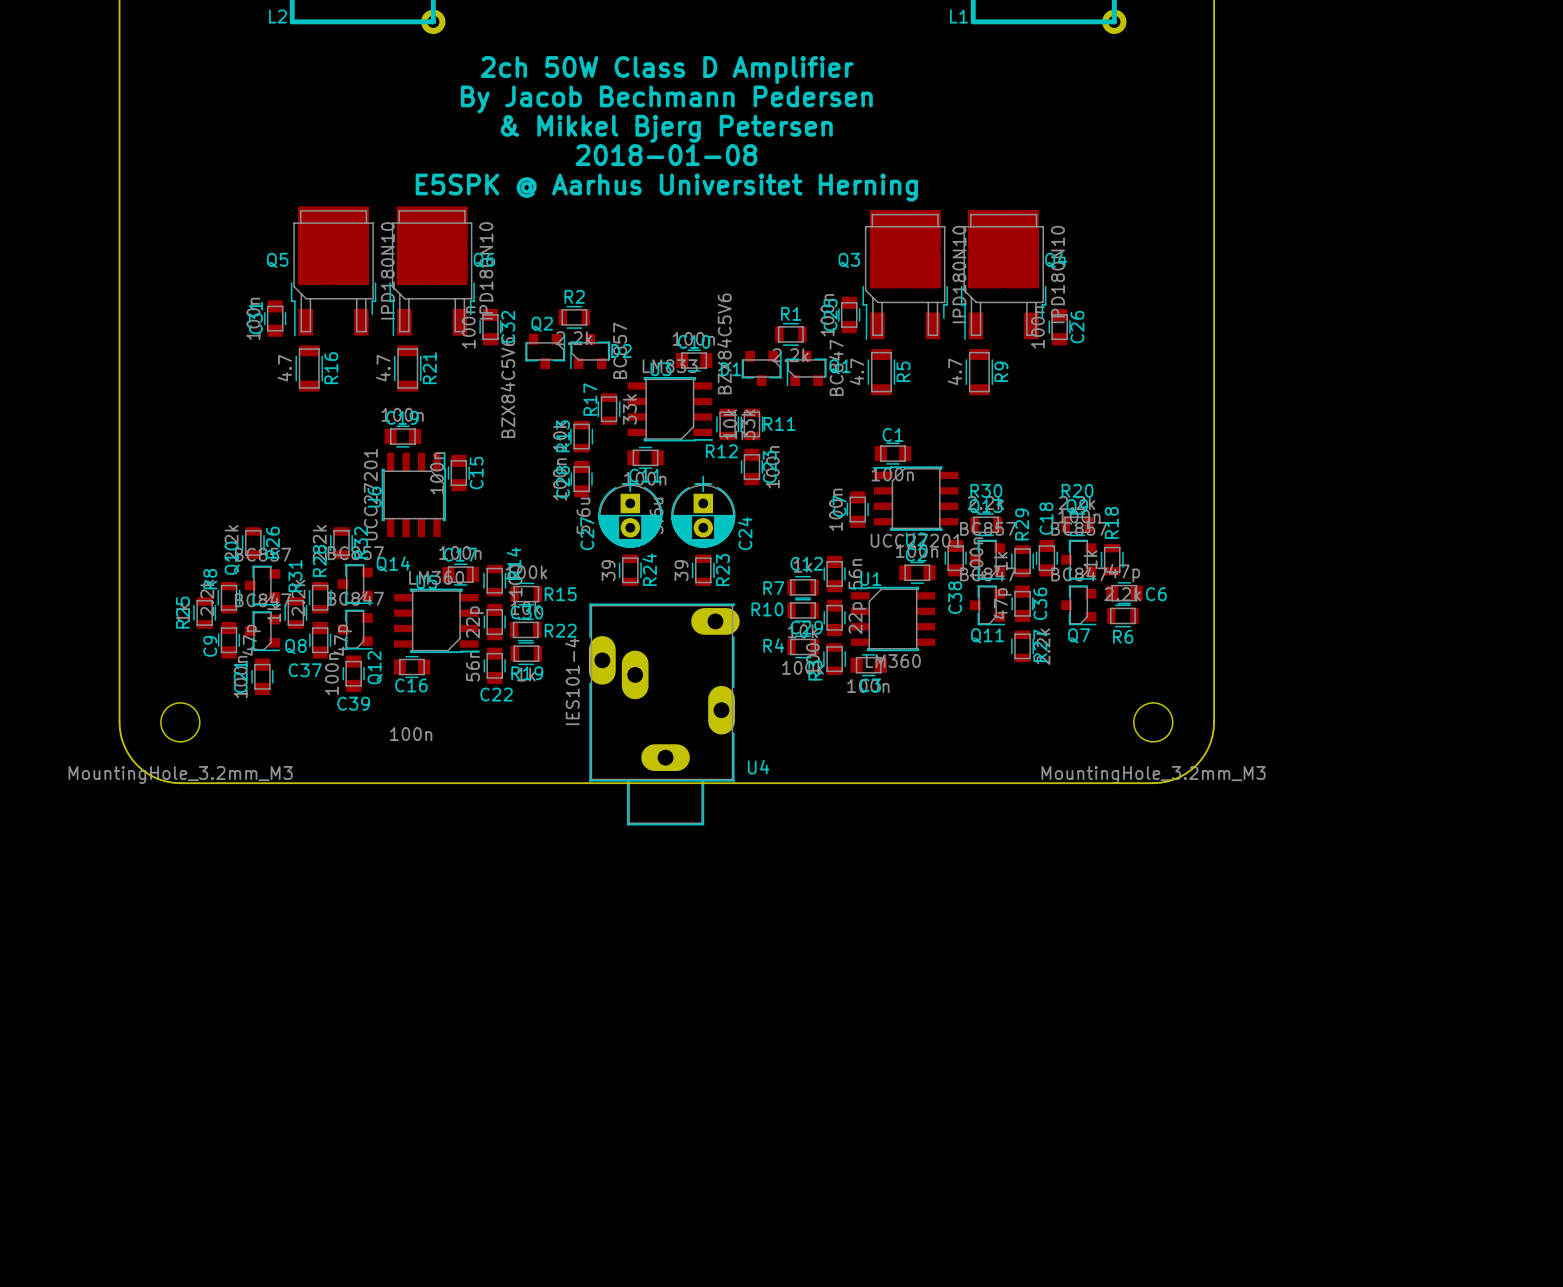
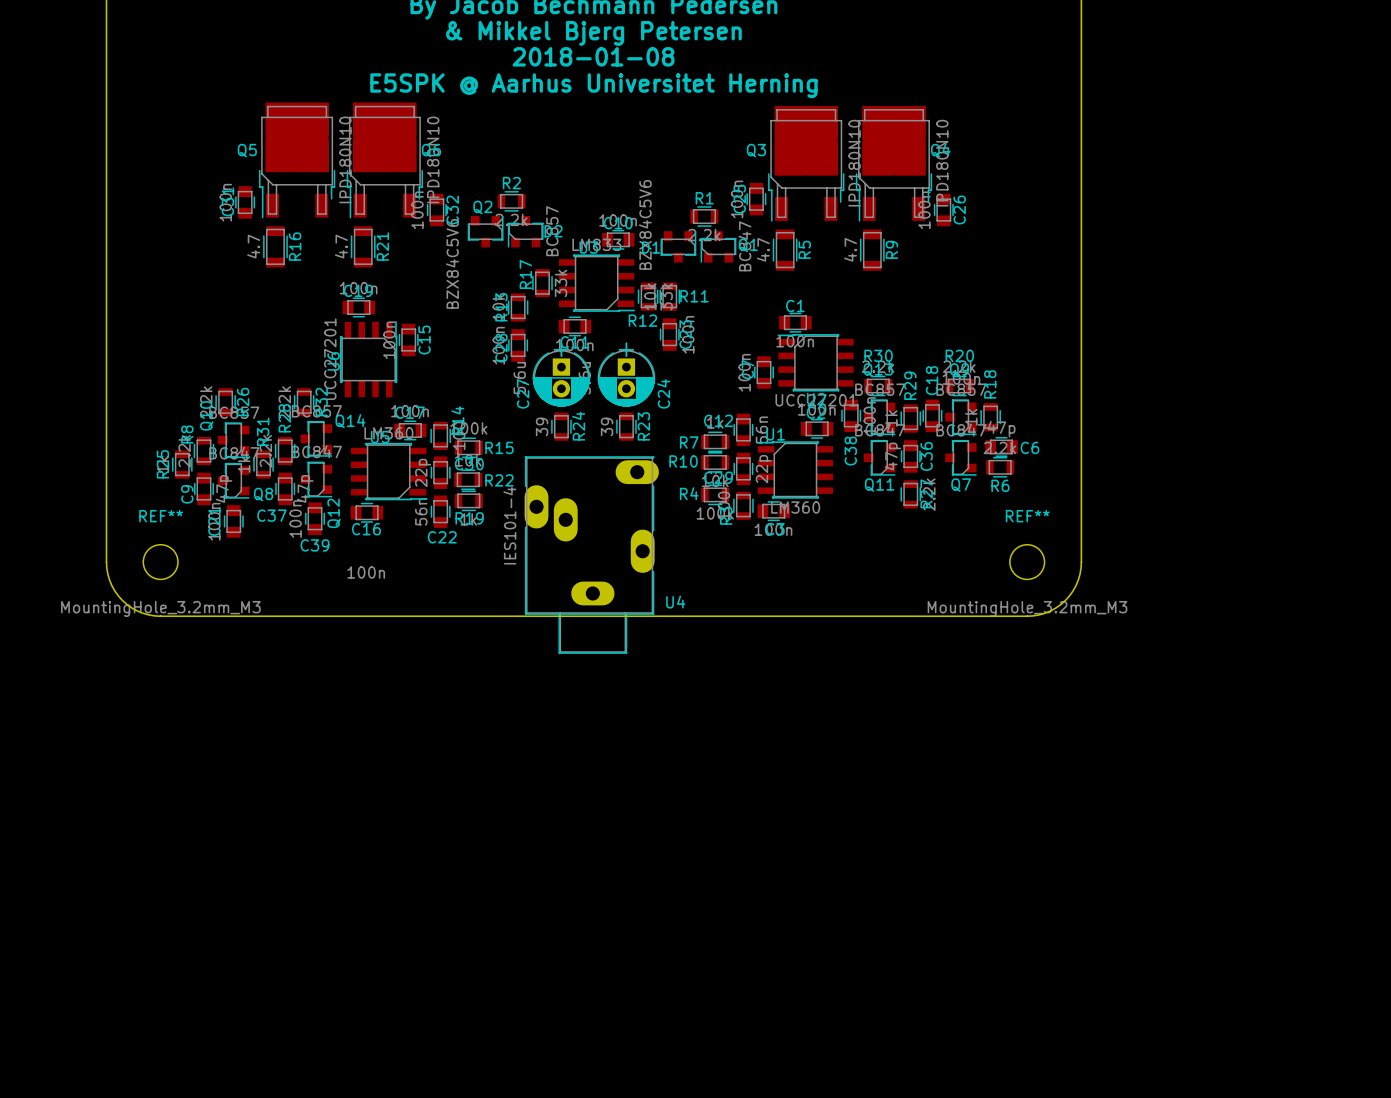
REF** name: none -> REF** (161, 516)
REF** name: none -> REF** (1027, 516)

